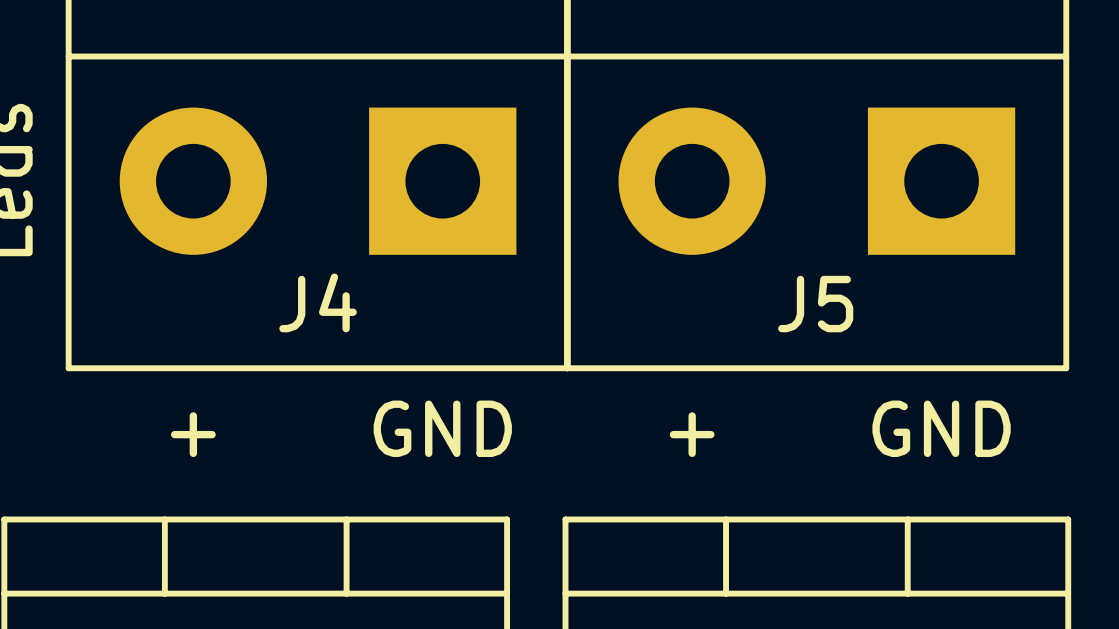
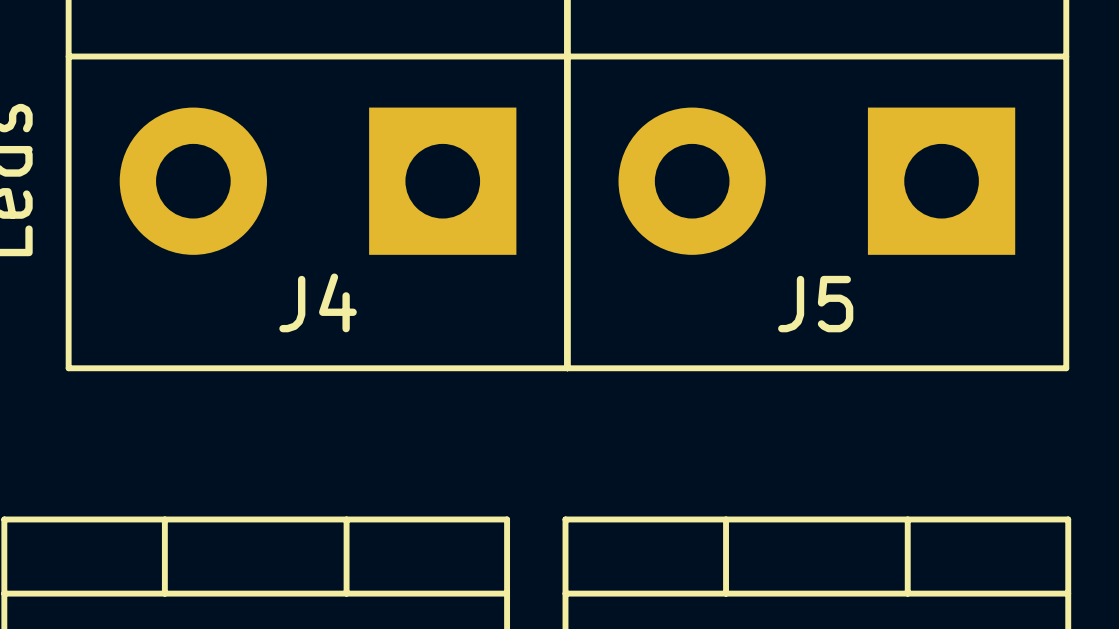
text: GND (442, 428) -> none
text: GND (941, 428) -> none
text: + (193, 434) -> none
text: + (692, 434) -> none

